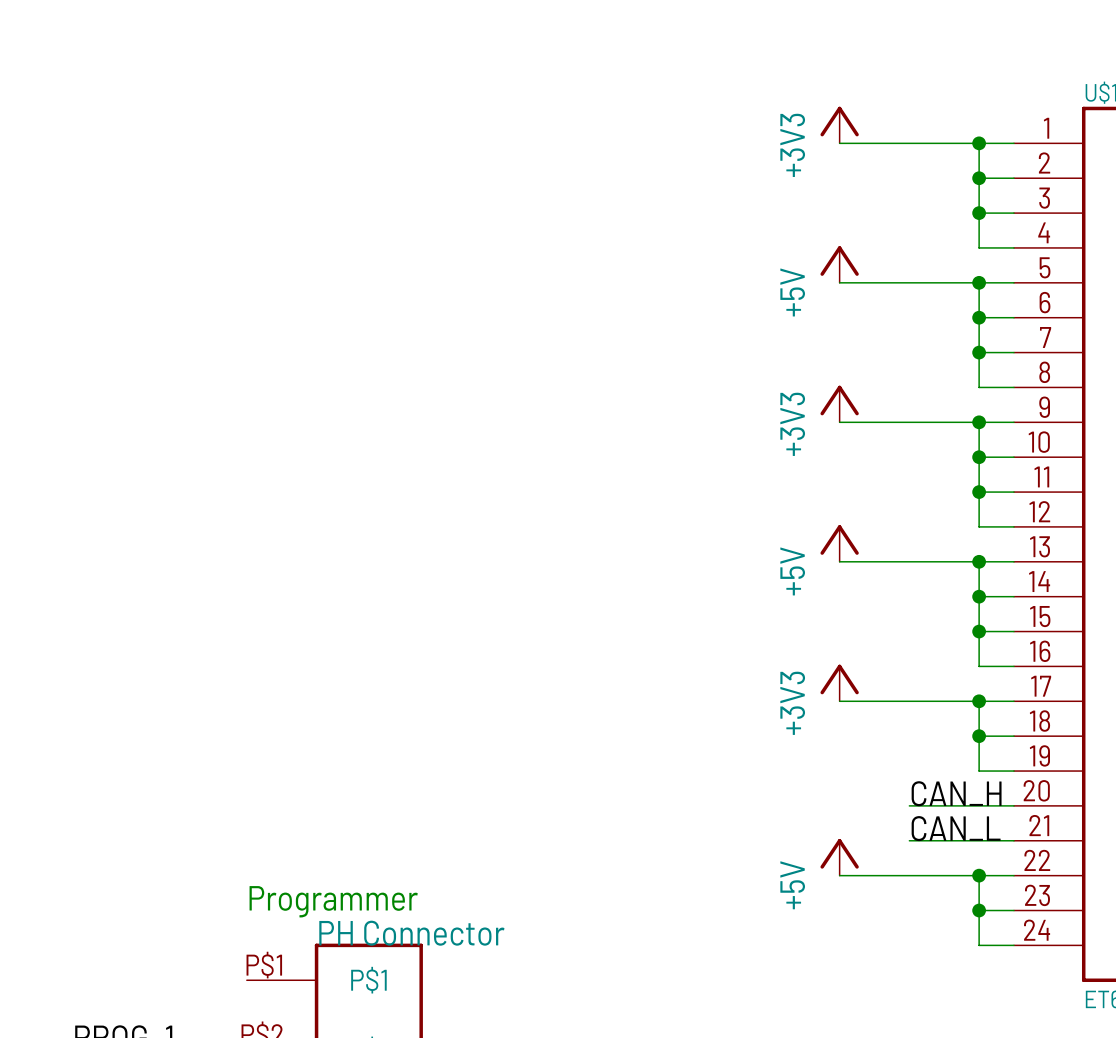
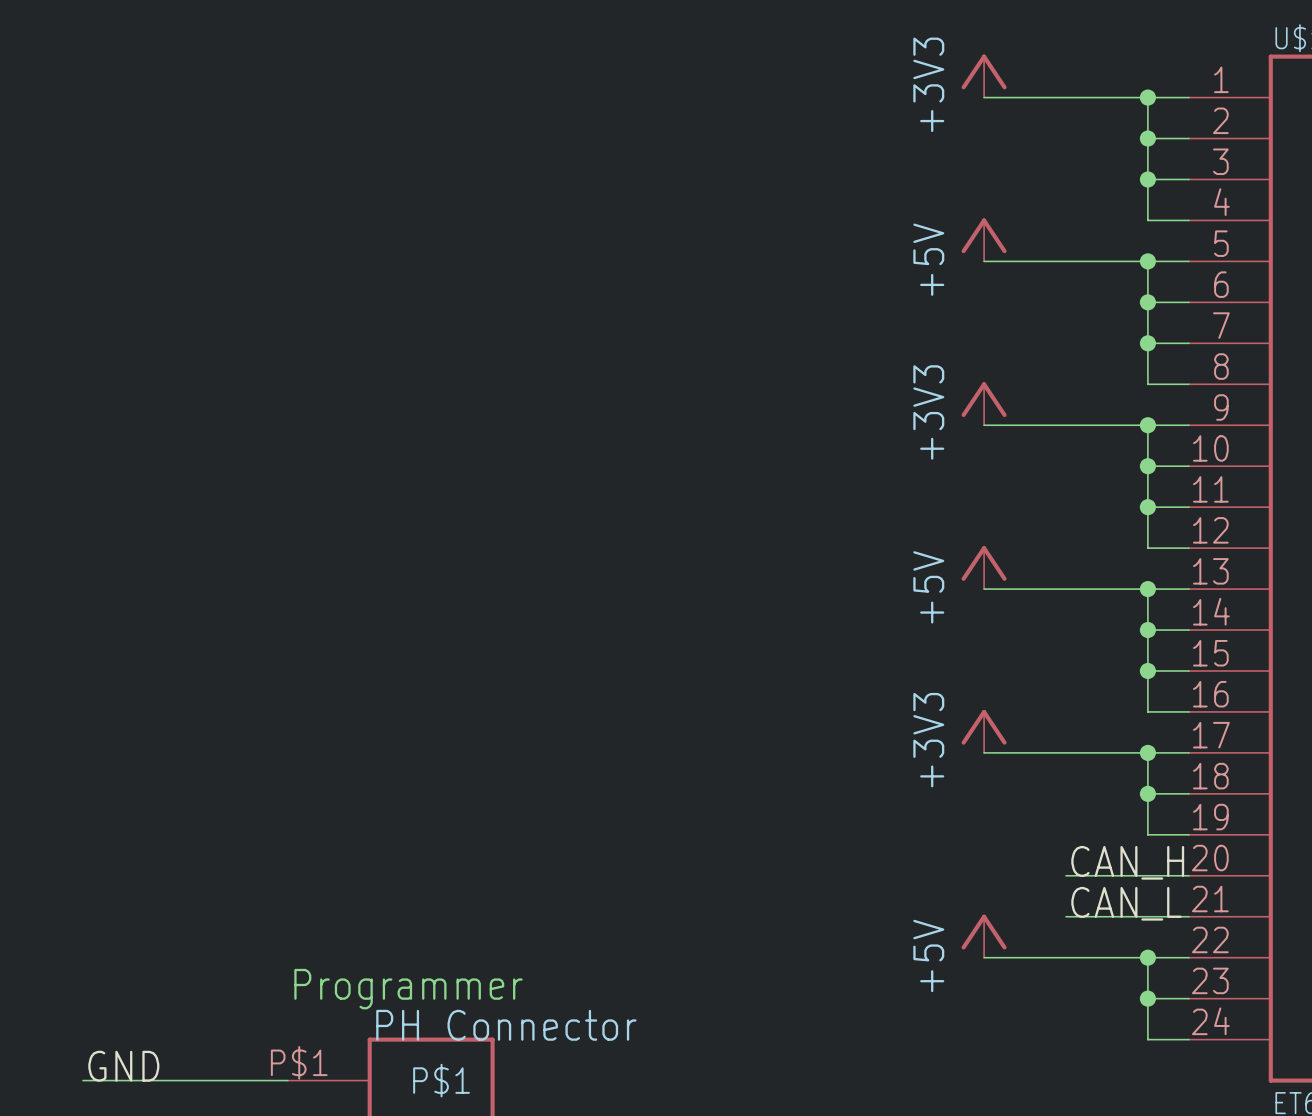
label: none -> GND (123, 1066)
wire: none -> (83, 1080) (287, 1080)

